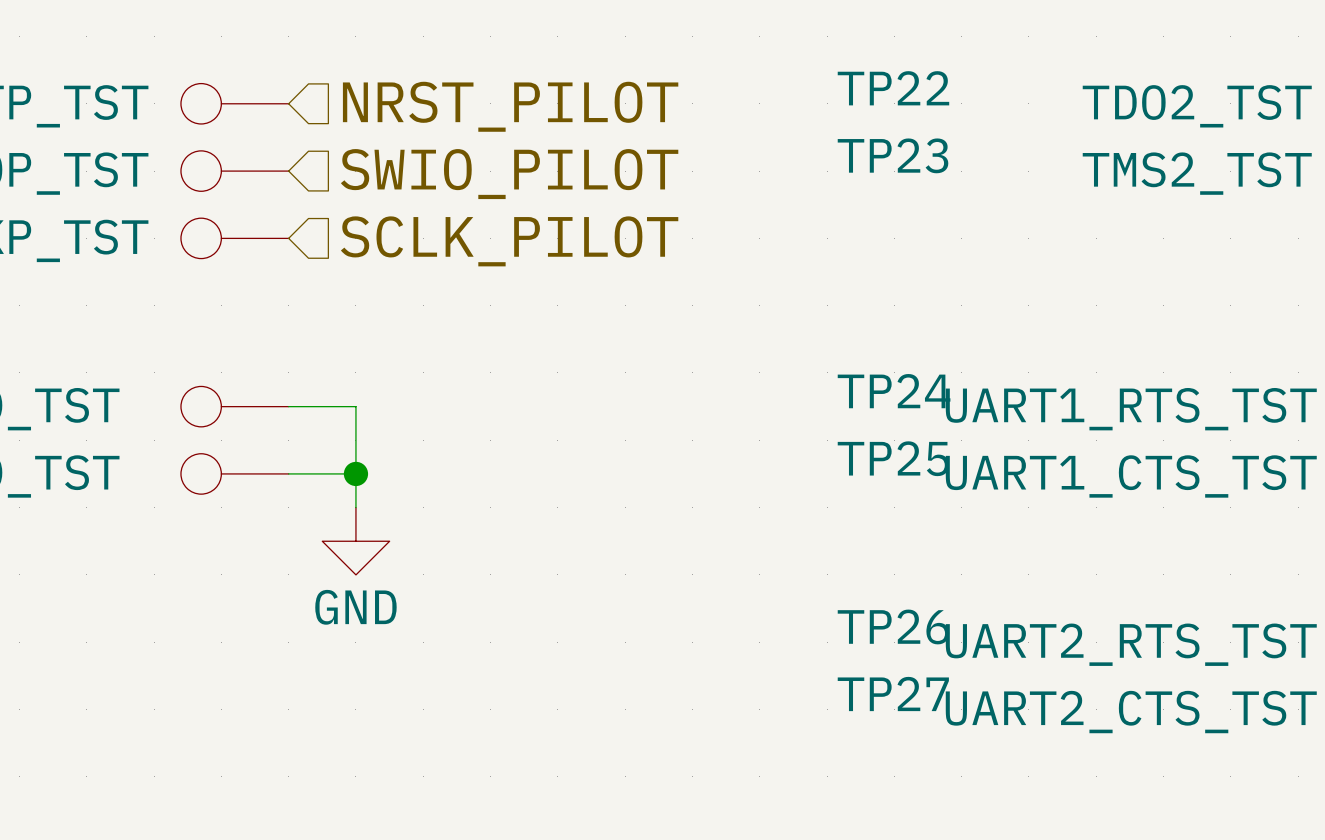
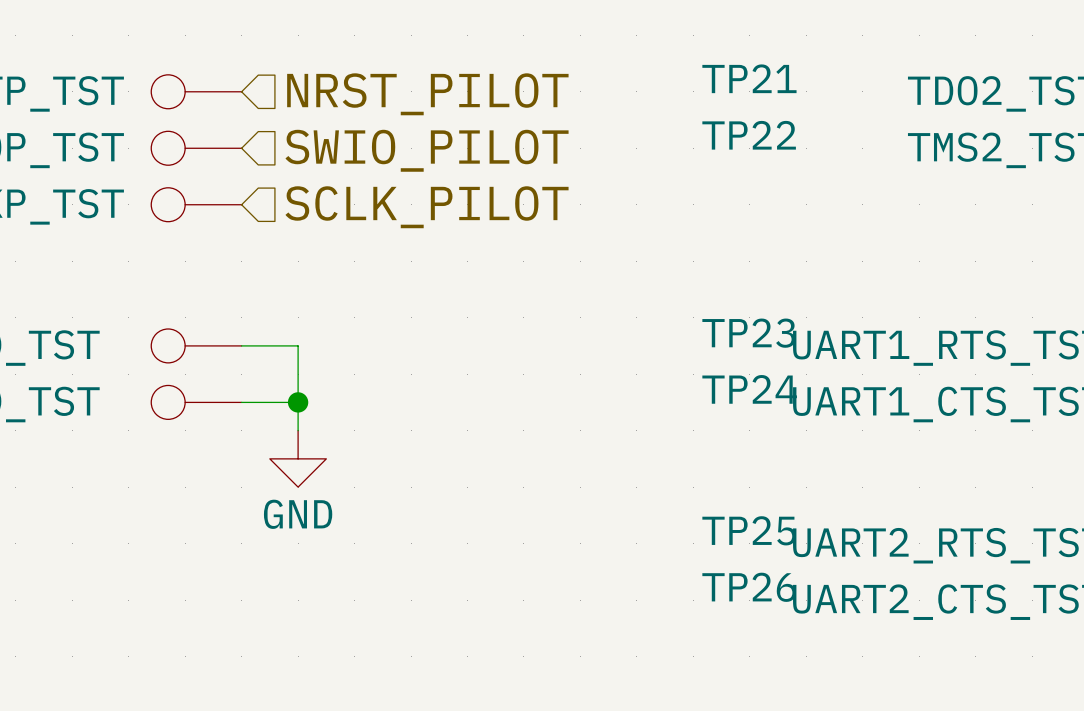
TP22 name: TP22 (893, 88) -> TP21 (749, 78)
TP23 name: TP23 (893, 155) -> TP22 (749, 135)
TP24 name: TP24 (894, 391) -> TP23 (748, 333)
TP25 name: TP25 (893, 458) -> TP24 (749, 389)
TP26 name: TP26 (893, 626) -> TP25 (749, 530)
TP27 name: TP27 (893, 693) -> TP26 (749, 587)

